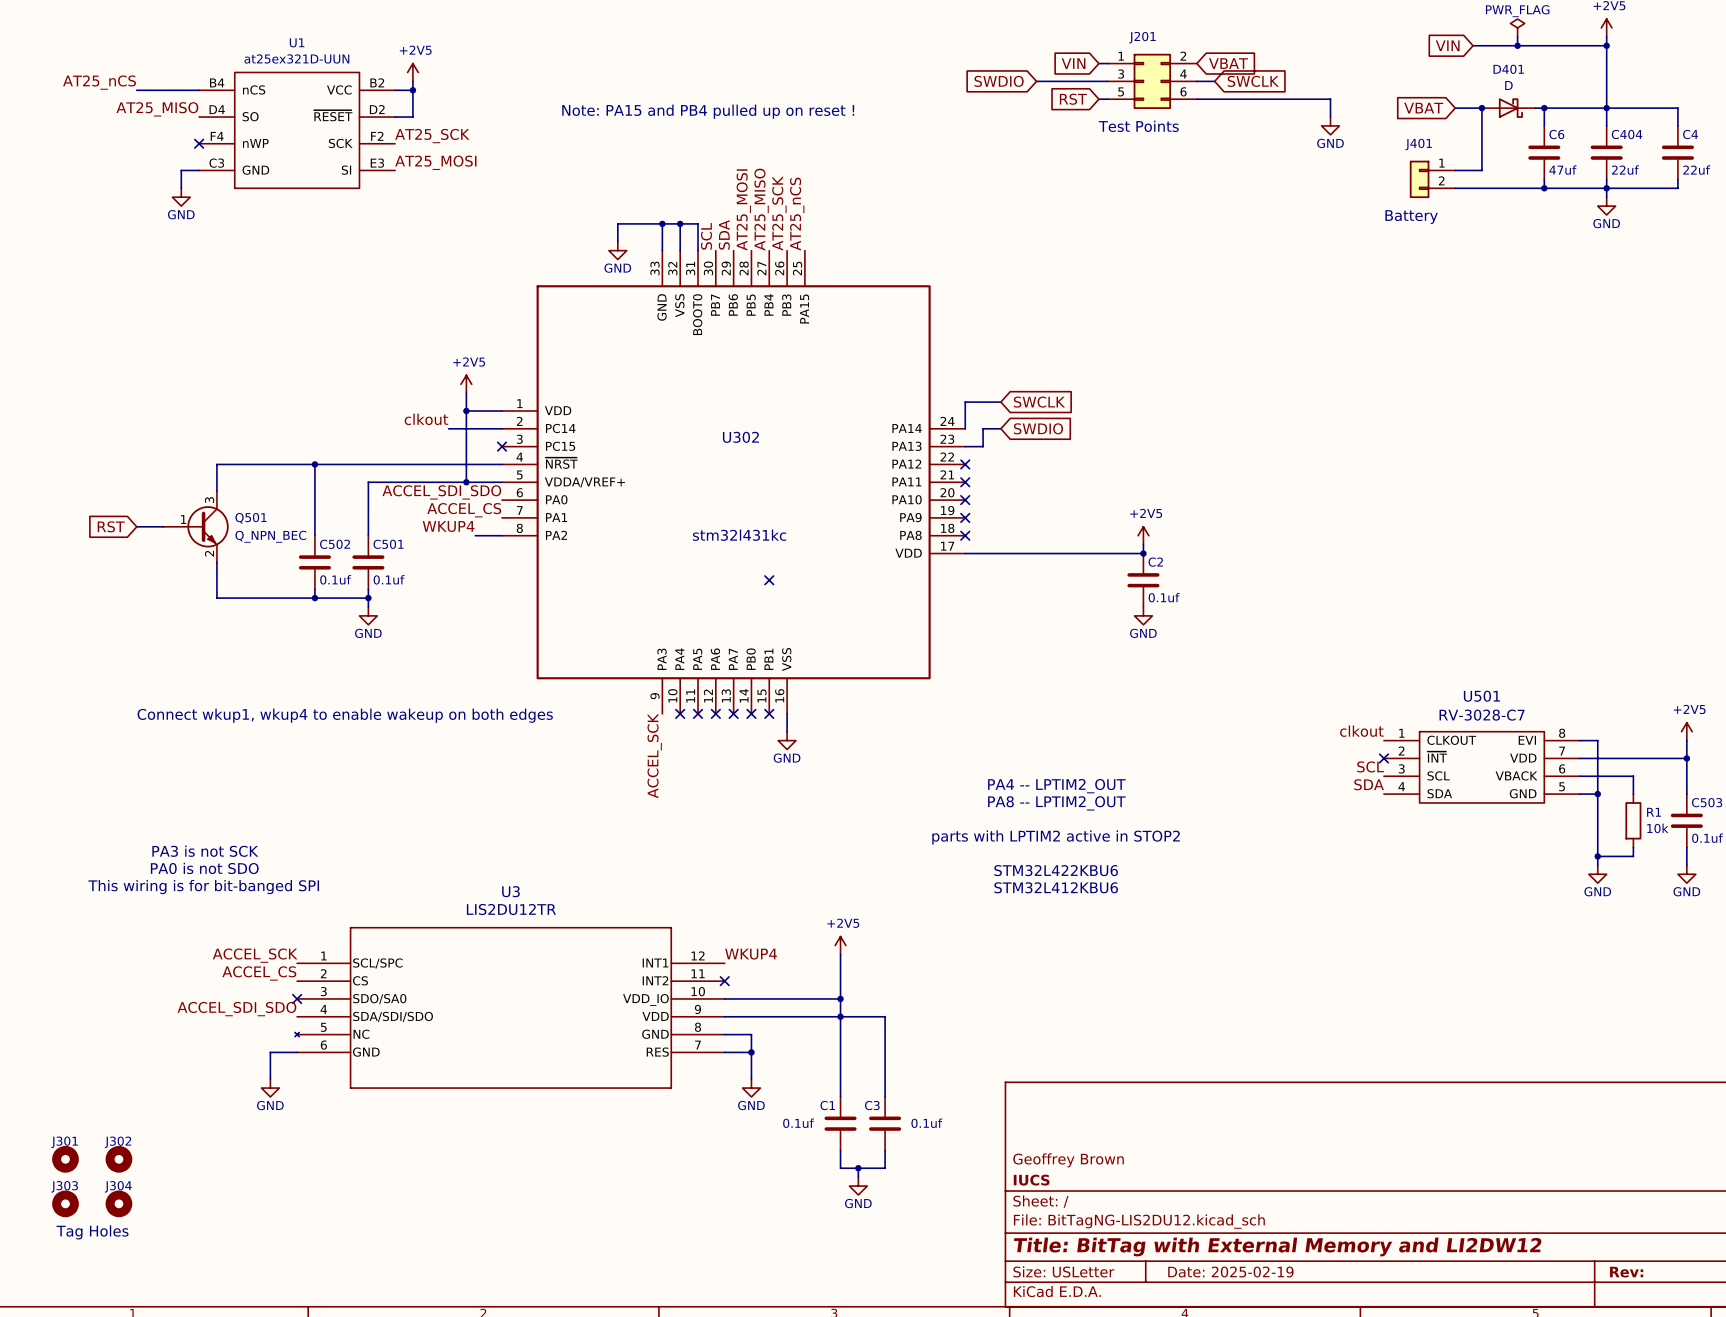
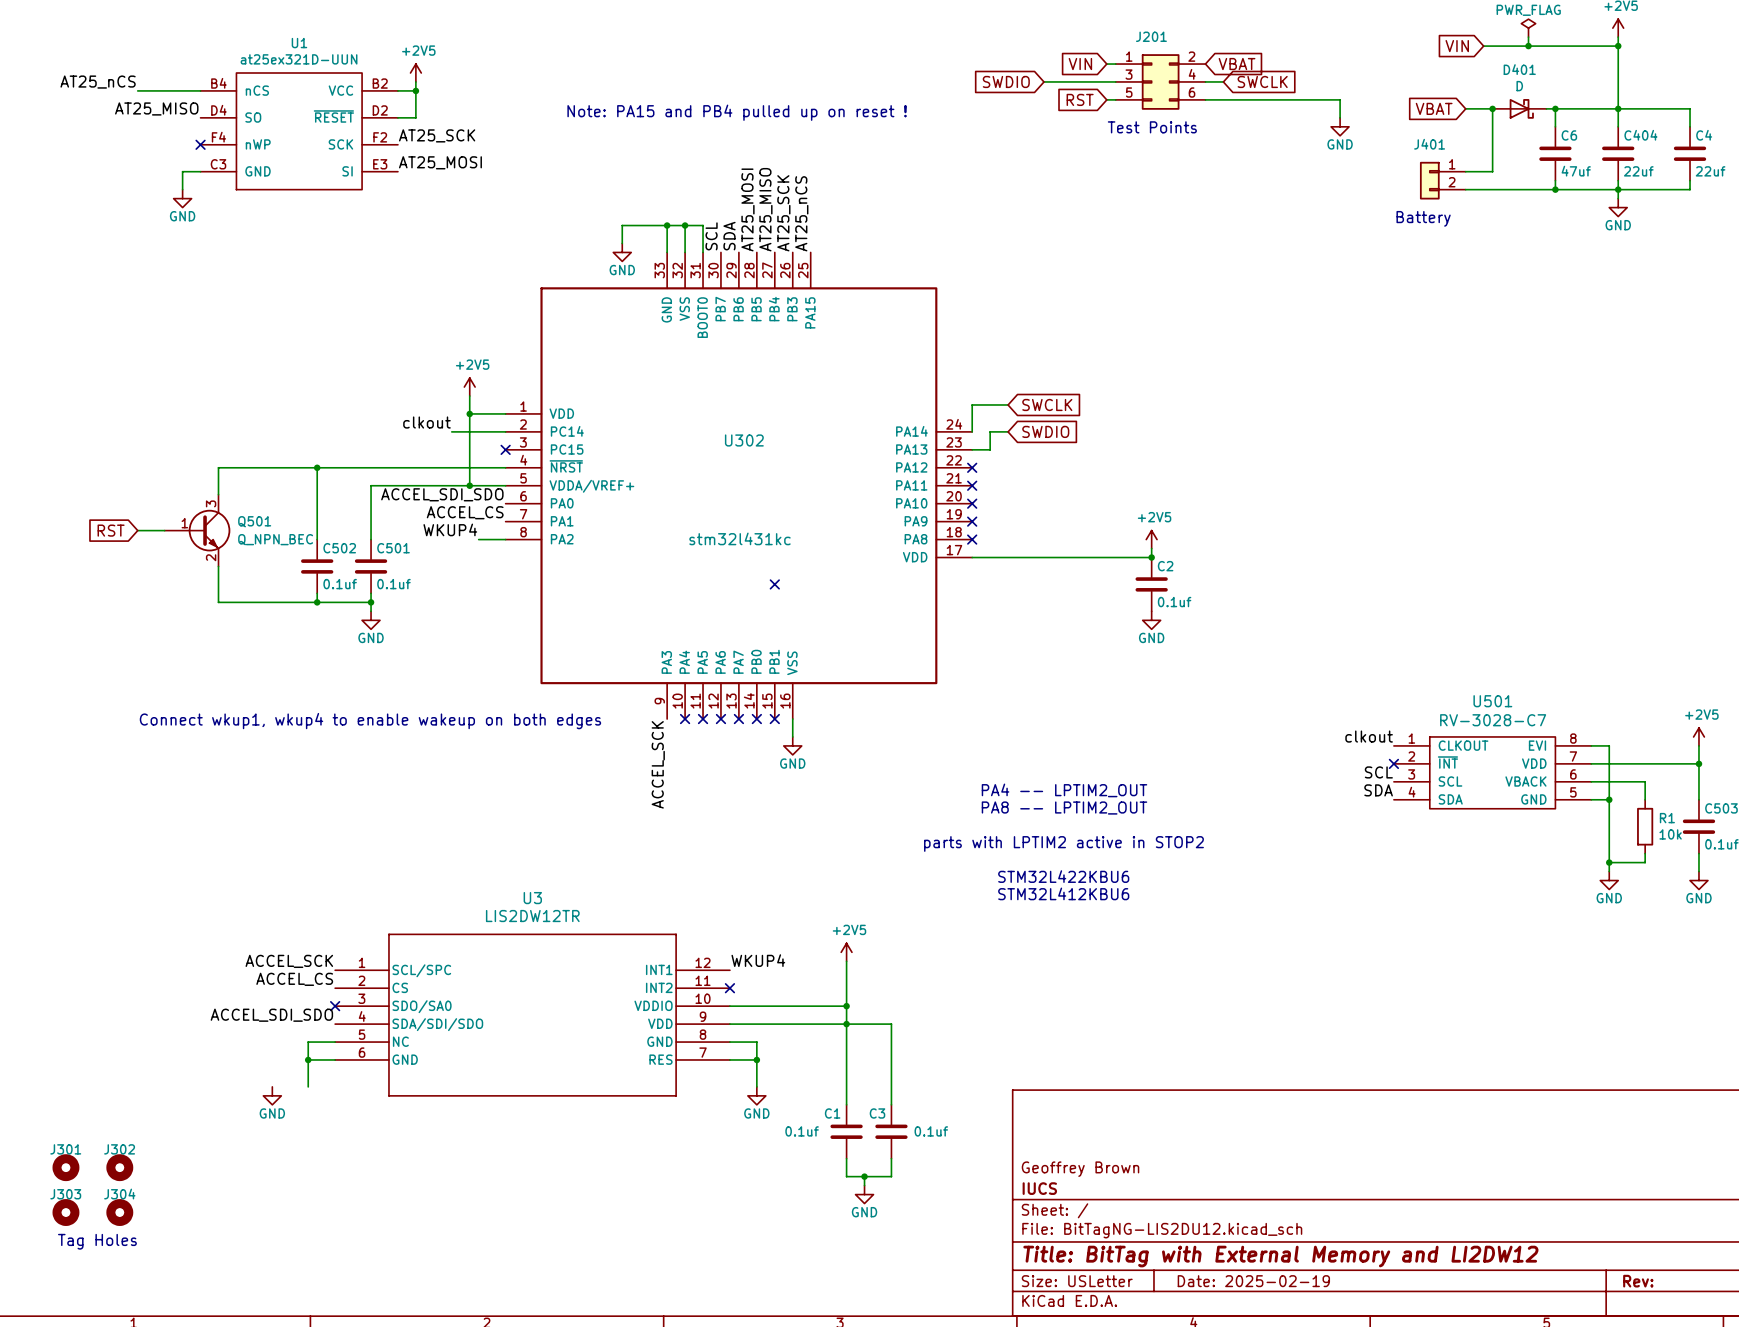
text: PA3 is not SCK (205, 851) -> none
text: PA0 is not SDO (204, 868) -> none
text: This wiring is for bit-banged SPI (203, 887) -> none
U3 value: LIS2DU12TR (511, 909) -> LIS2DW12TR (532, 916)
U3 symbol: [295, 927, 725, 1089] -> [335, 933, 730, 1097]
label position: ACCEL_SCK (255, 955) -> ACCEL_SCK (289, 961)
label position: ACCEL_CS (259, 973) -> ACCEL_CS (294, 979)
no-connect mark position: (297, 998) -> (335, 1006)
label position: ACCEL_SDI_SDO (236, 1009) -> ACCEL_SDI_SDO (271, 1015)
wire: none -> (335, 1042) (308, 1042) (308, 1086)
wire: (297, 1052) (270, 1052) (270, 1079) -> none
junction: none -> (308, 1059)

